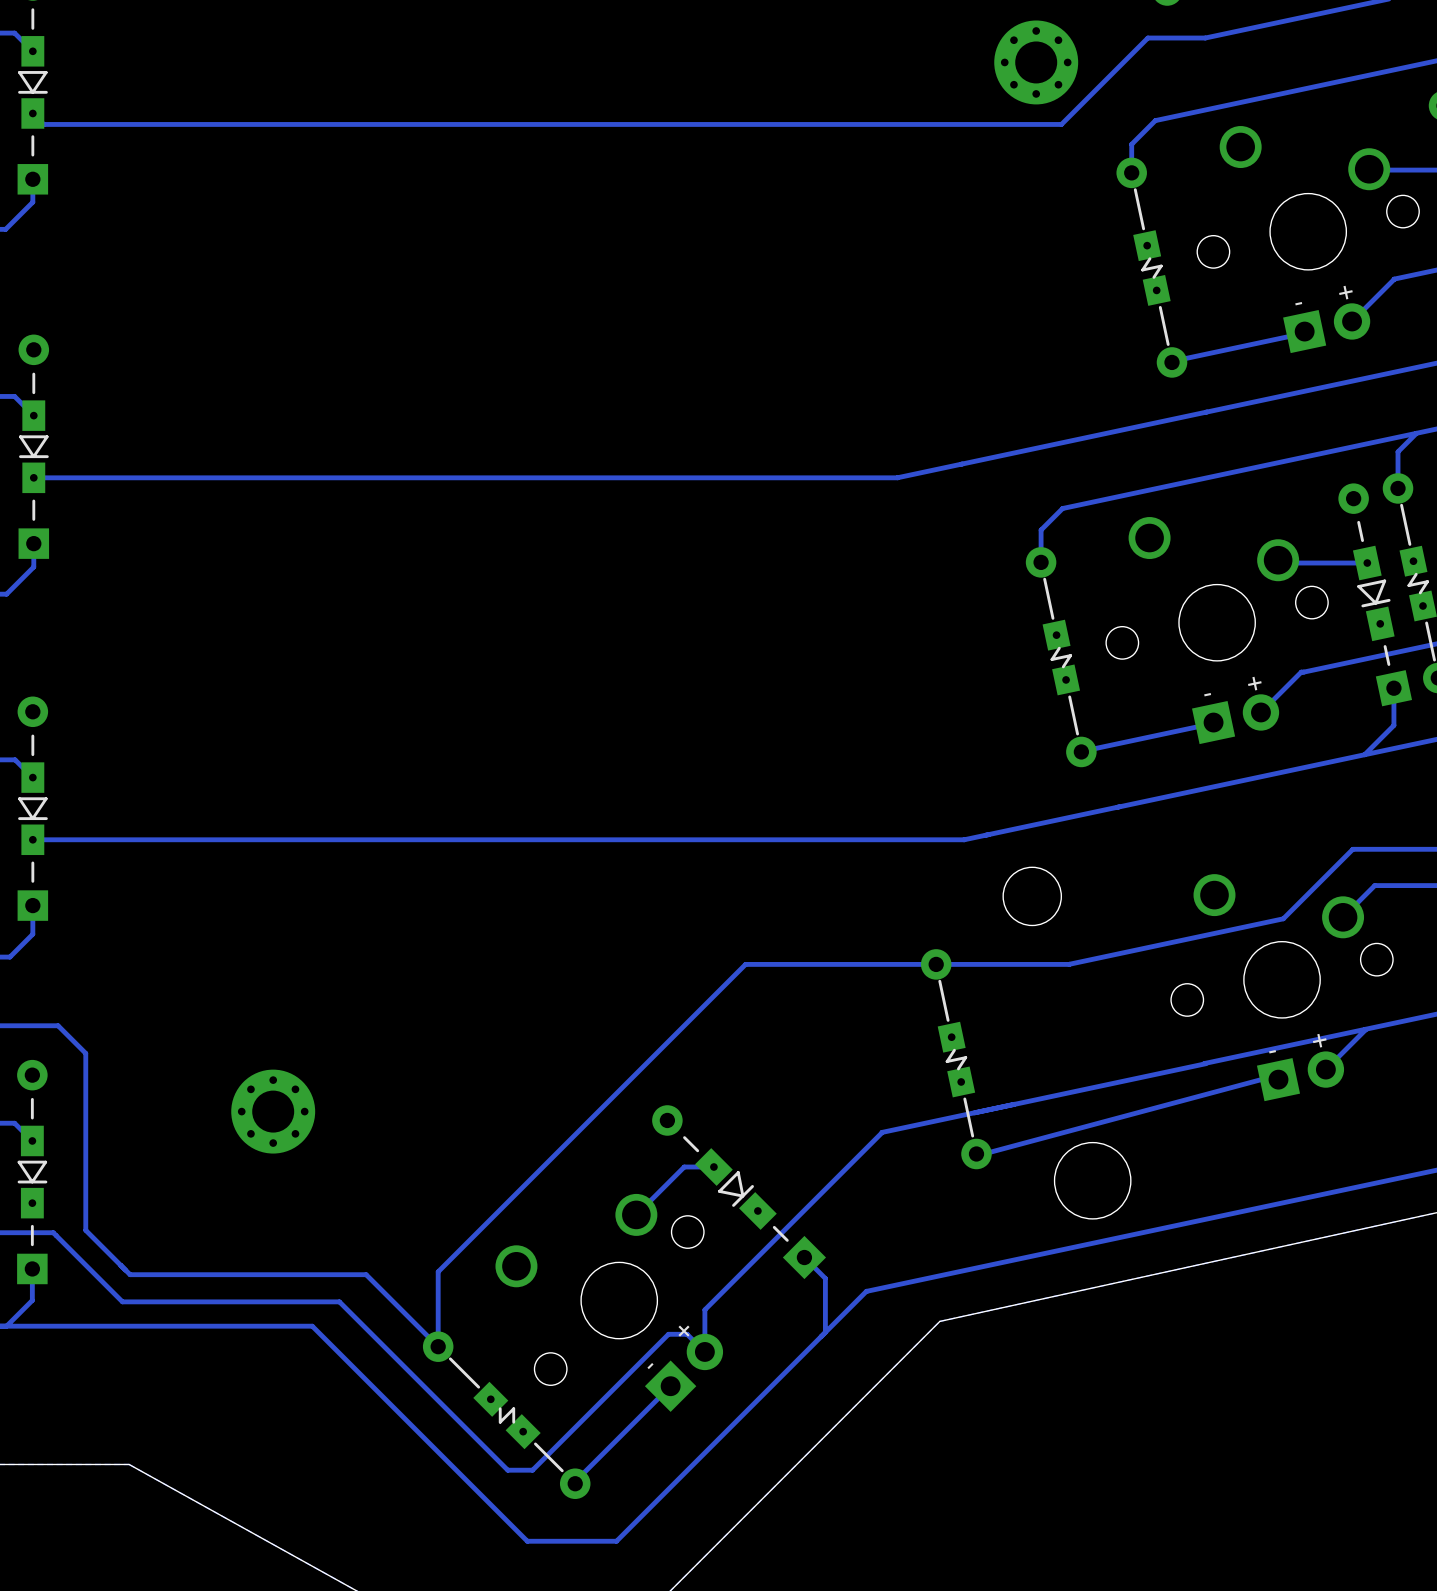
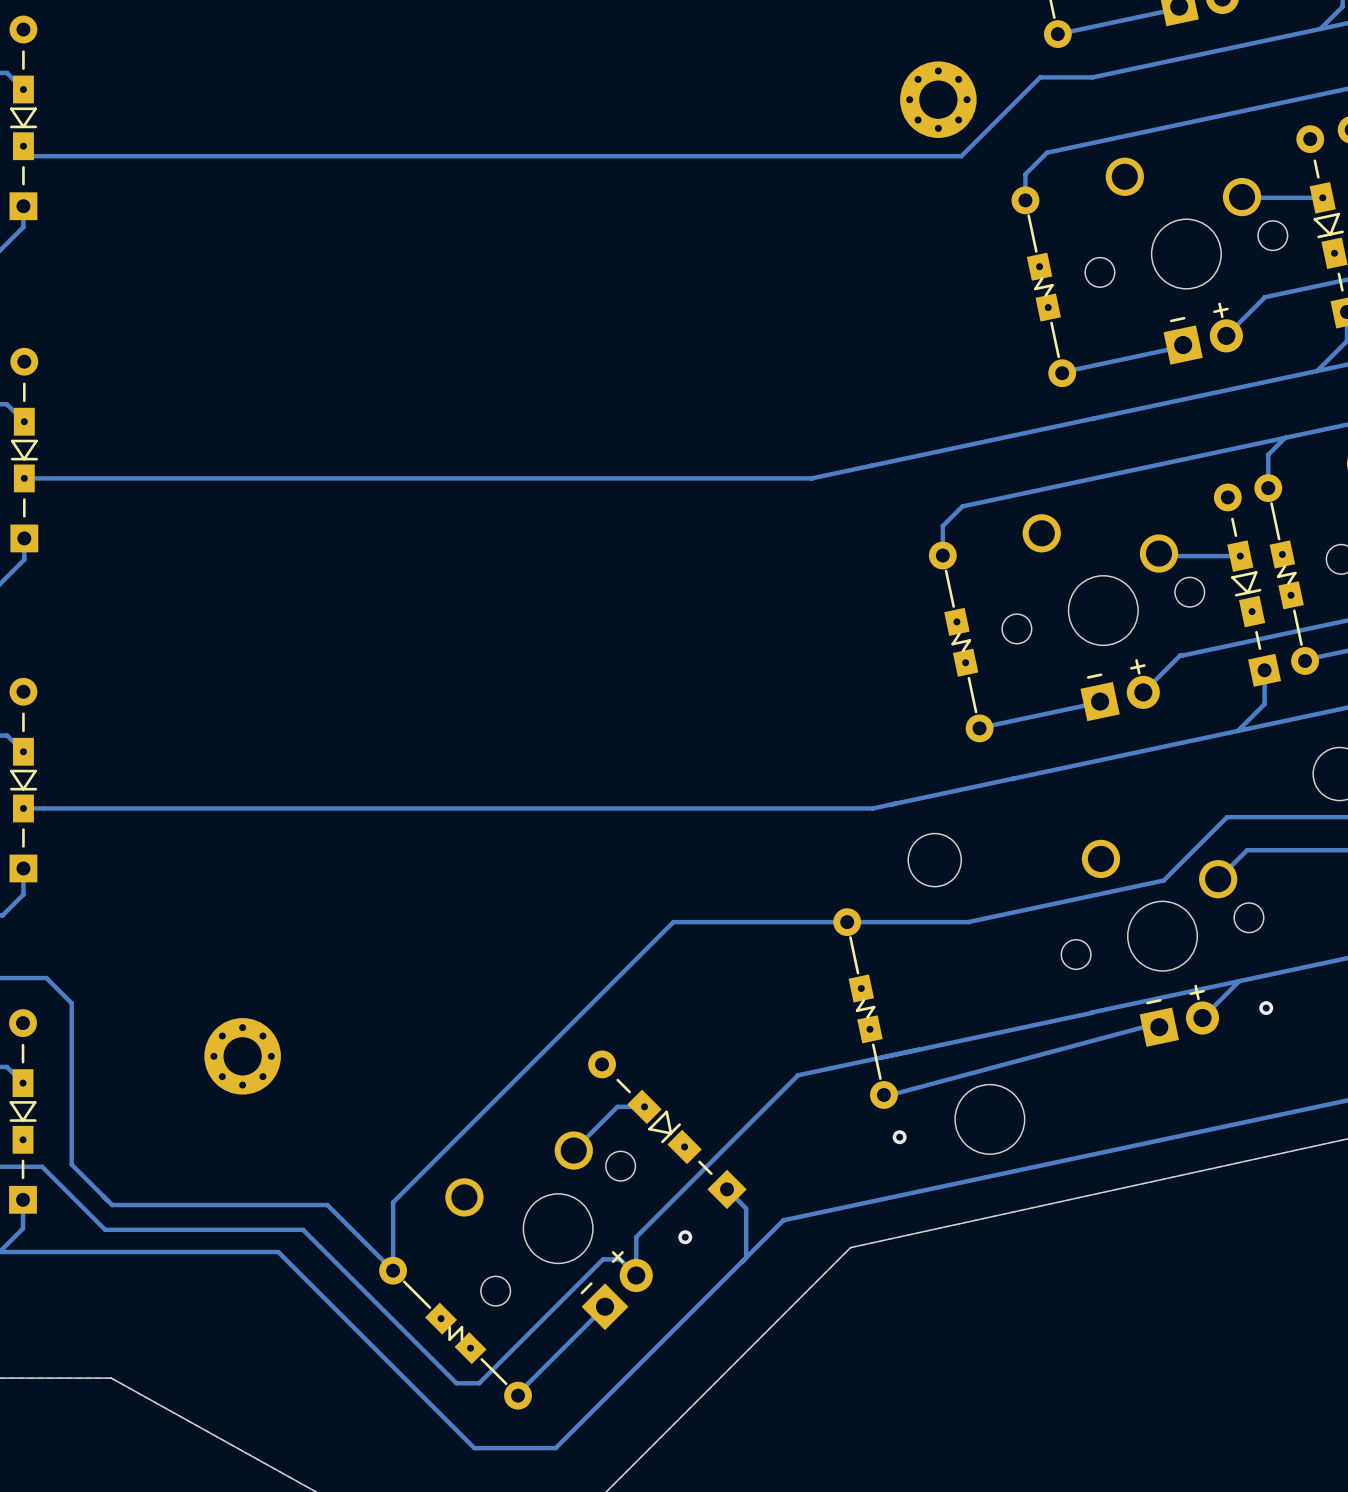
via: none -> (1266, 1008)
via: none -> (899, 1137)
via: none -> (685, 1237)

